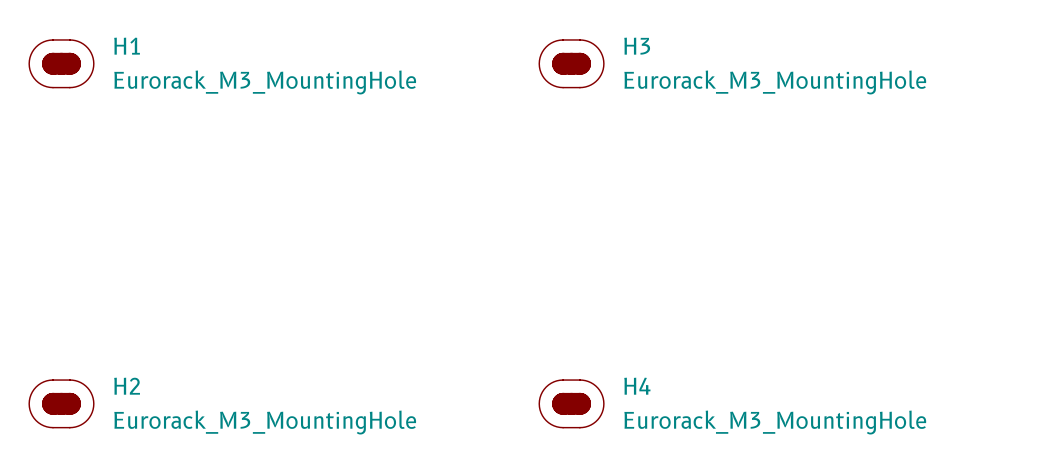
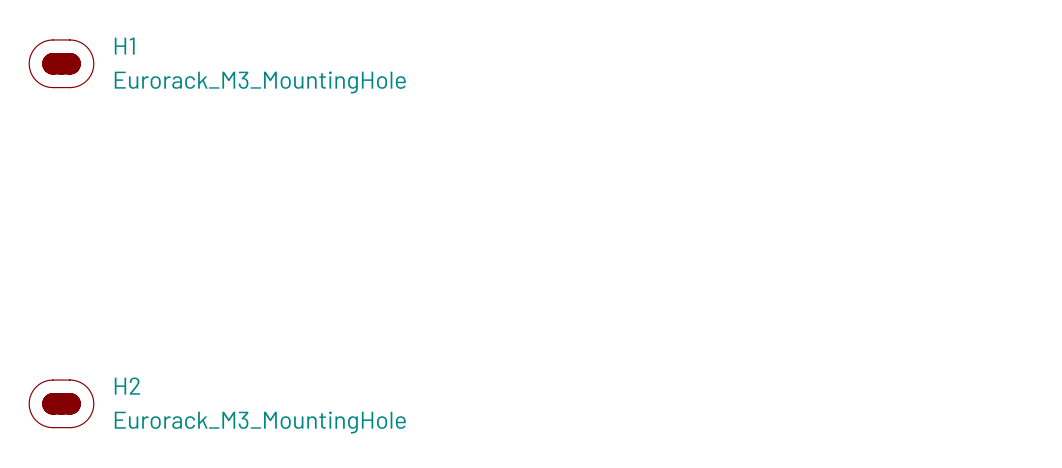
H3: Eurorack_M3_MountingHole (571, 63) -> none
H4: Eurorack_M3_MountingHole (571, 403) -> none

